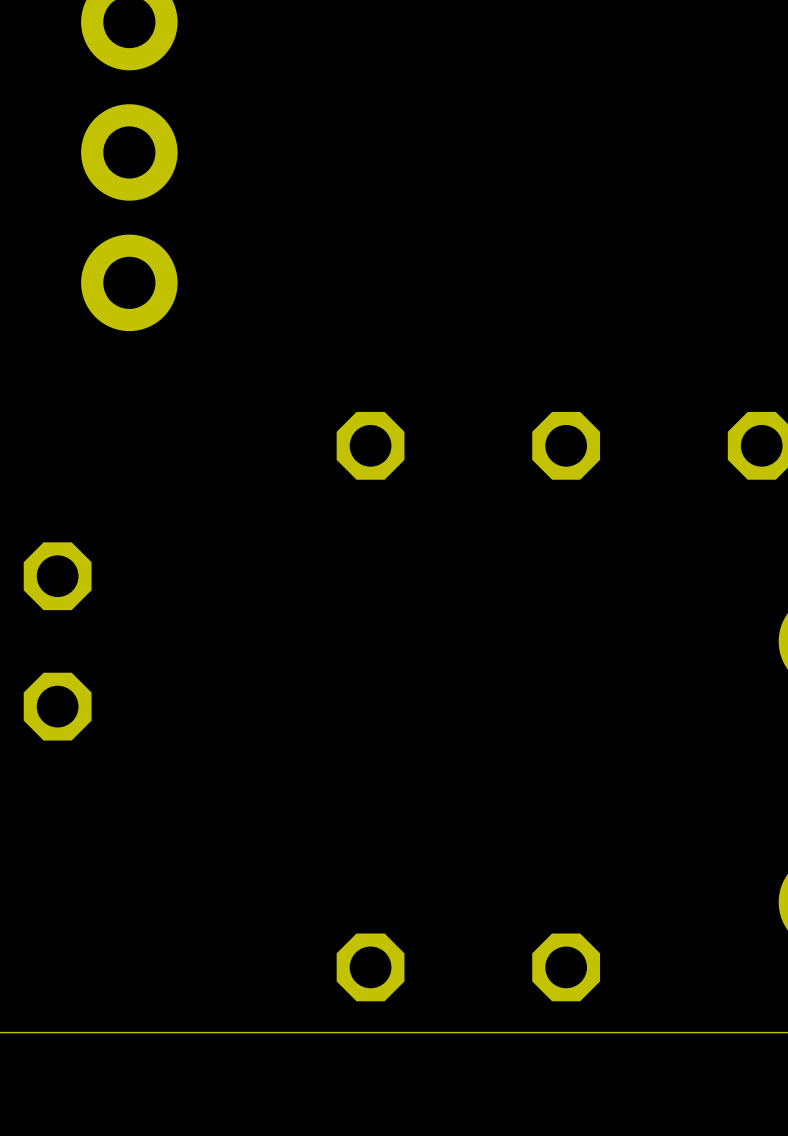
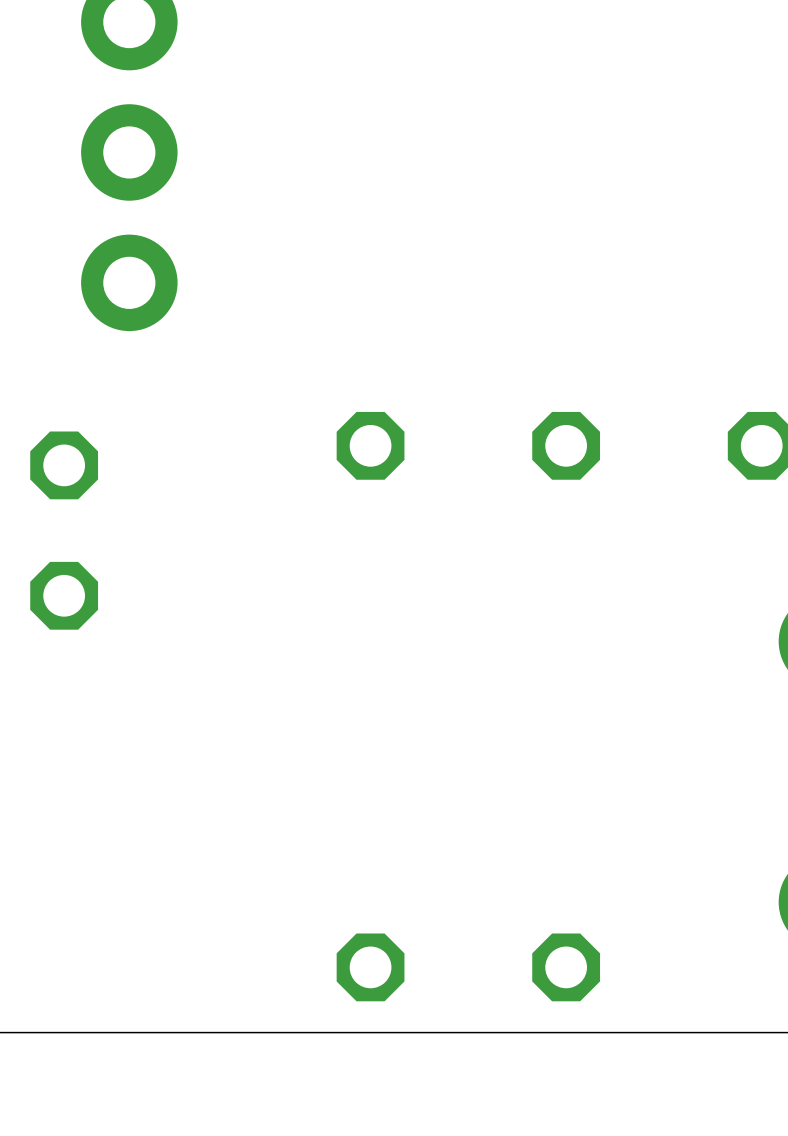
part position: (57, 641) -> (64, 530)

